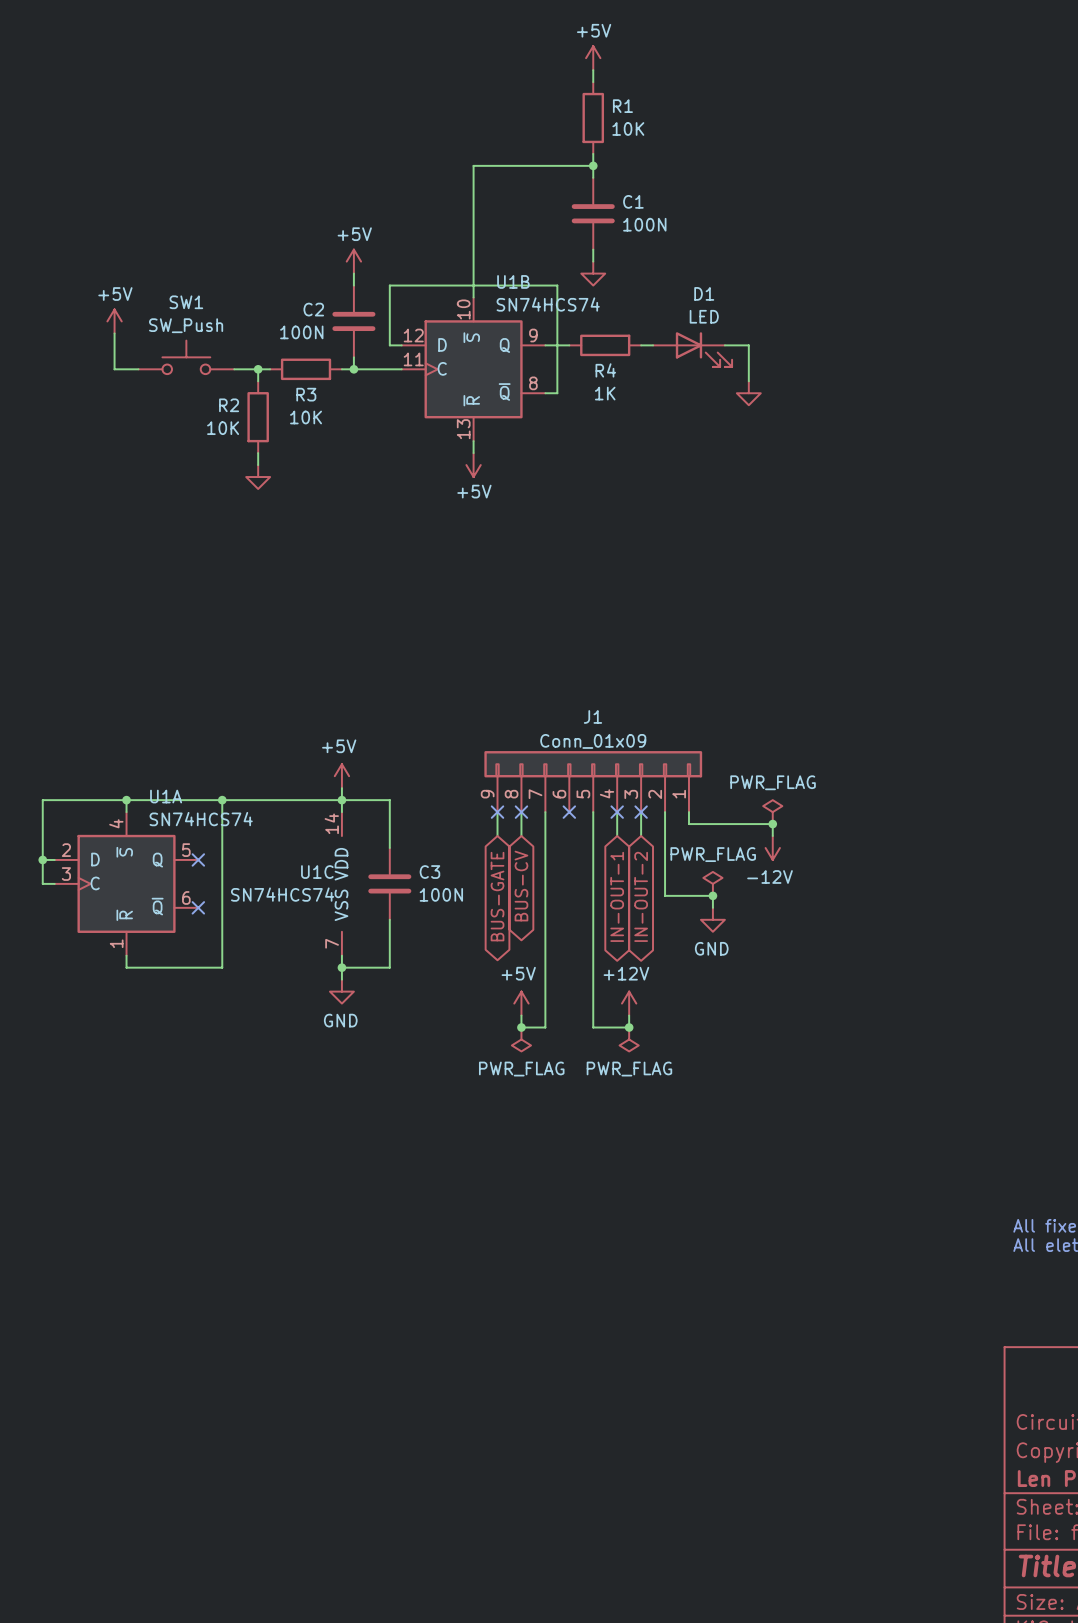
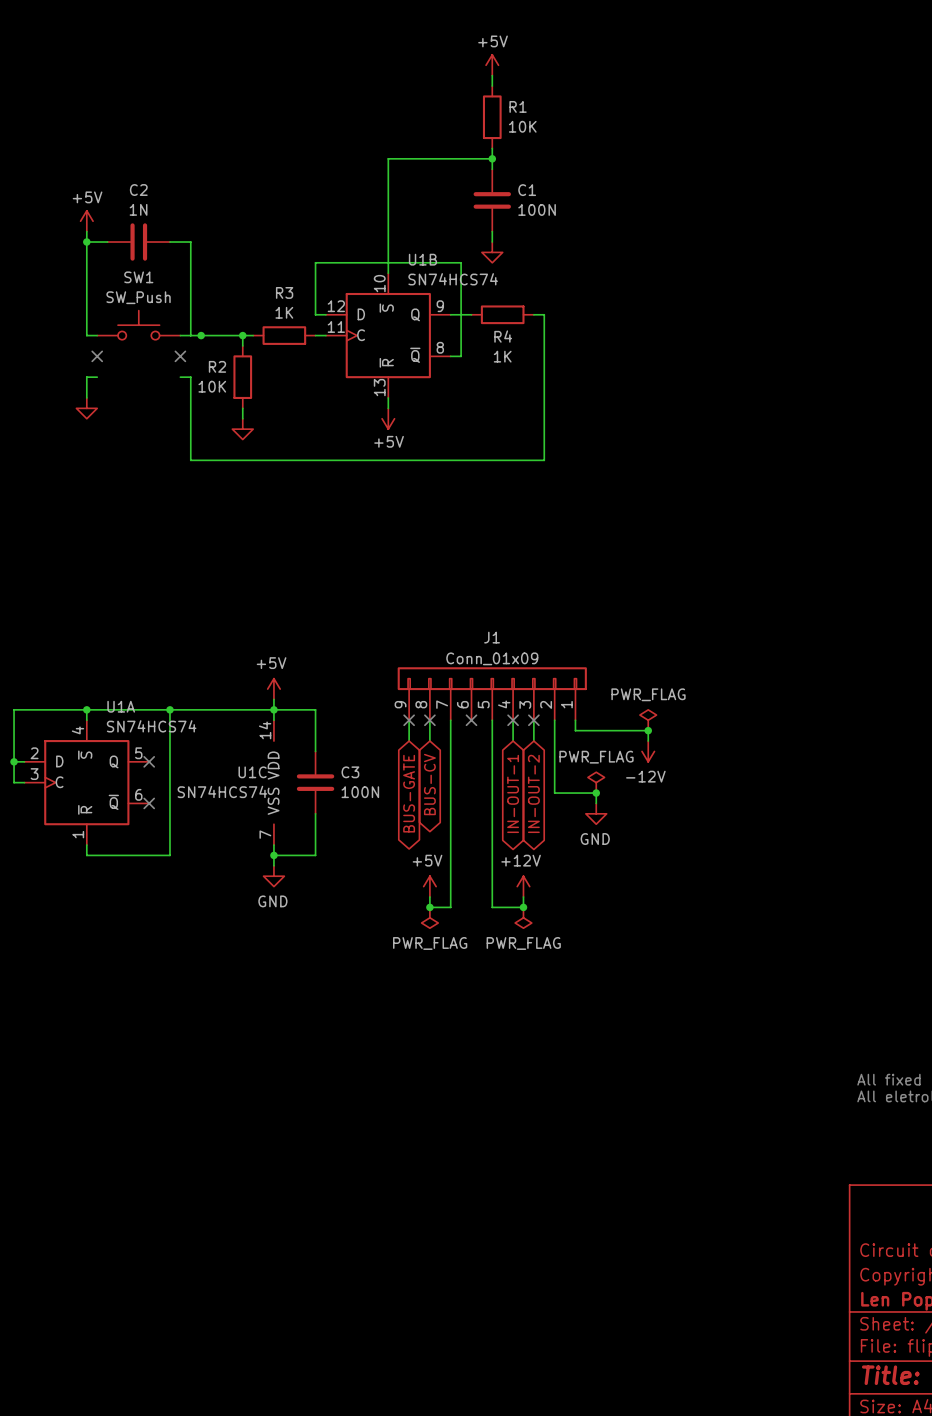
wire: none -> (86, 242) (107, 242)
junction: none -> (86, 242)
wire: none -> (169, 242) (190, 242) (190, 335)
power symbol: +5V (353, 261) -> none
wire: (353, 273) (353, 285) -> none
C2 name position: C2 (313, 309) -> C2 (138, 190)
power symbol position: +5V (114, 321) -> +5V (86, 221)
C2 rotation: 0° (353, 321) -> 90° clockwise (138, 242)
C2 position: (353, 321) -> (138, 242)
C2 value: 100N (301, 332) -> 1N (138, 209)
wire: (114, 333) (114, 369) (126, 369) -> (86, 231) (86, 335)
wire: none -> (544, 314) (544, 460) (190, 460) (190, 377) (180, 377)
wire: (724, 345) (748, 345) (748, 381) -> none
D1: LED (692, 349) -> none
wire: (353, 357) (353, 369) -> none
wire: (258, 369) (258, 381) -> (242, 335) (242, 345)
R3 position: (306, 369) -> (284, 335)
wire: (341, 369) (389, 369) -> (211, 335) (253, 335)
junction position: (353, 369) -> (242, 335)
no-connect mark: none -> (97, 356)
no-connect mark: none -> (180, 356)
power symbol: (748, 393) -> none
R3 name position: R3 (306, 394) -> R3 (284, 292)
wire: none -> (97, 377) (86, 377) (86, 397)
R2 position: (258, 417) -> (242, 377)
R3 value: 10K (306, 417) -> 1K (284, 312)
power symbol: none -> (86, 408)
wire: (258, 453) (258, 465) -> (242, 408) (242, 418)
power symbol position: (258, 477) -> (242, 429)

